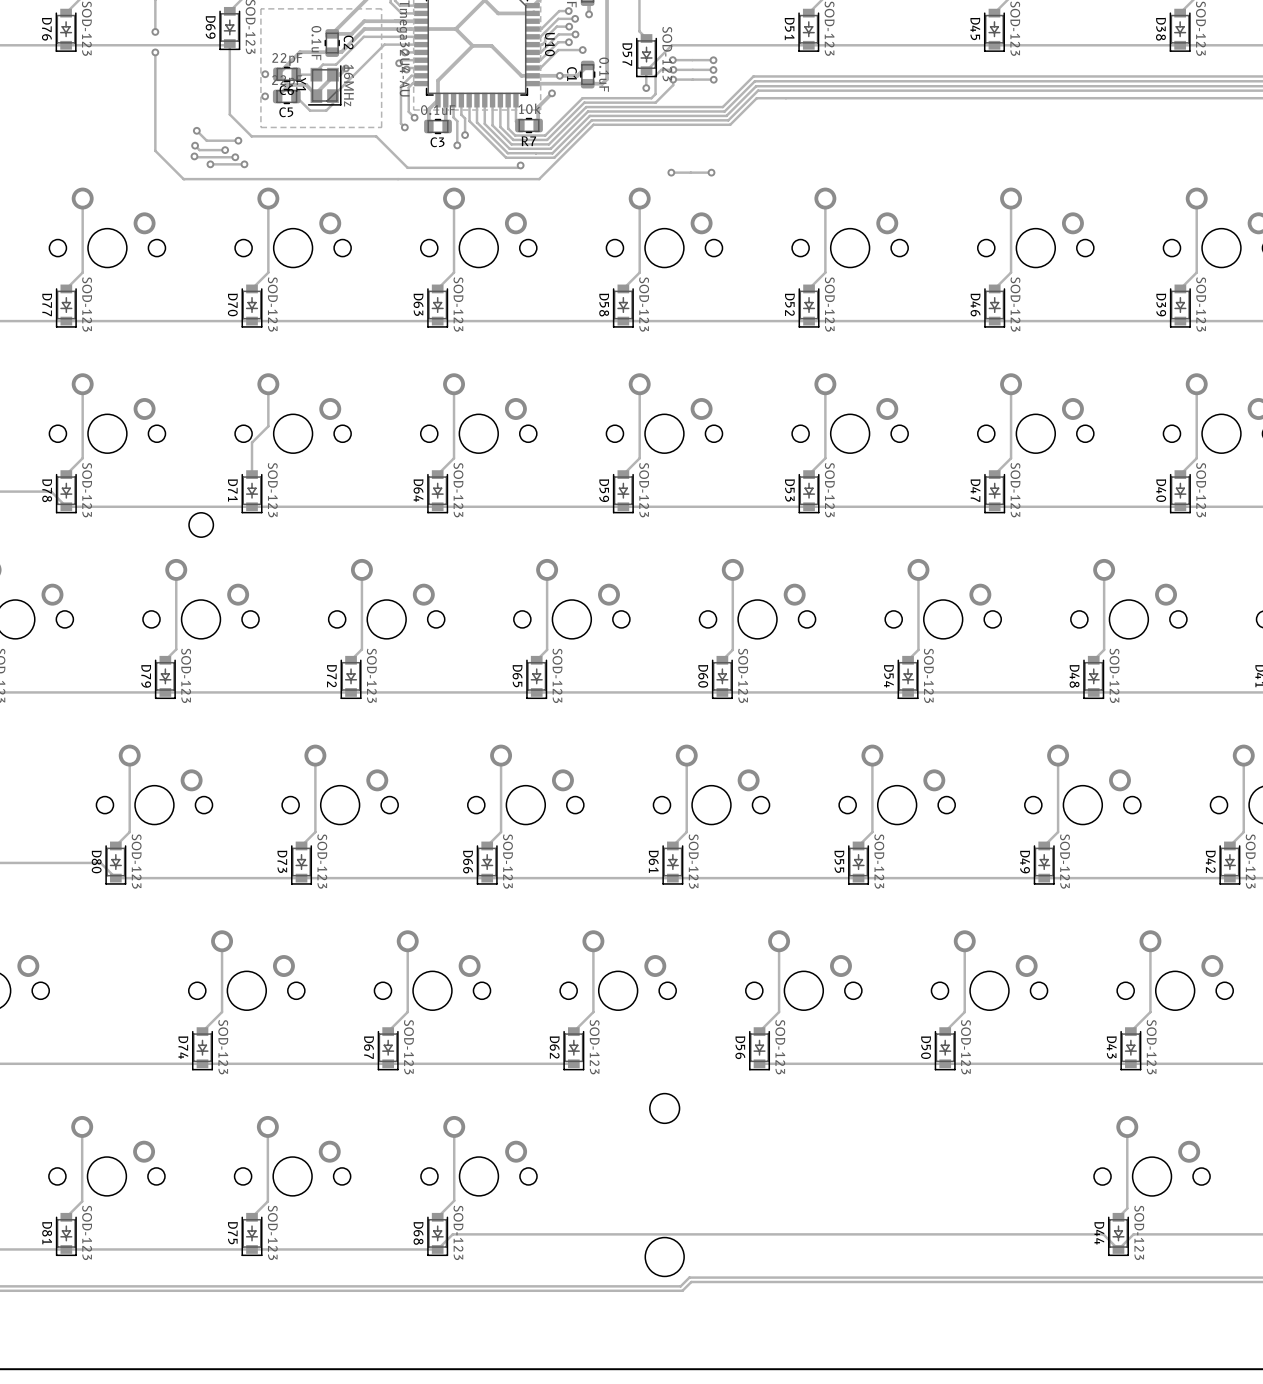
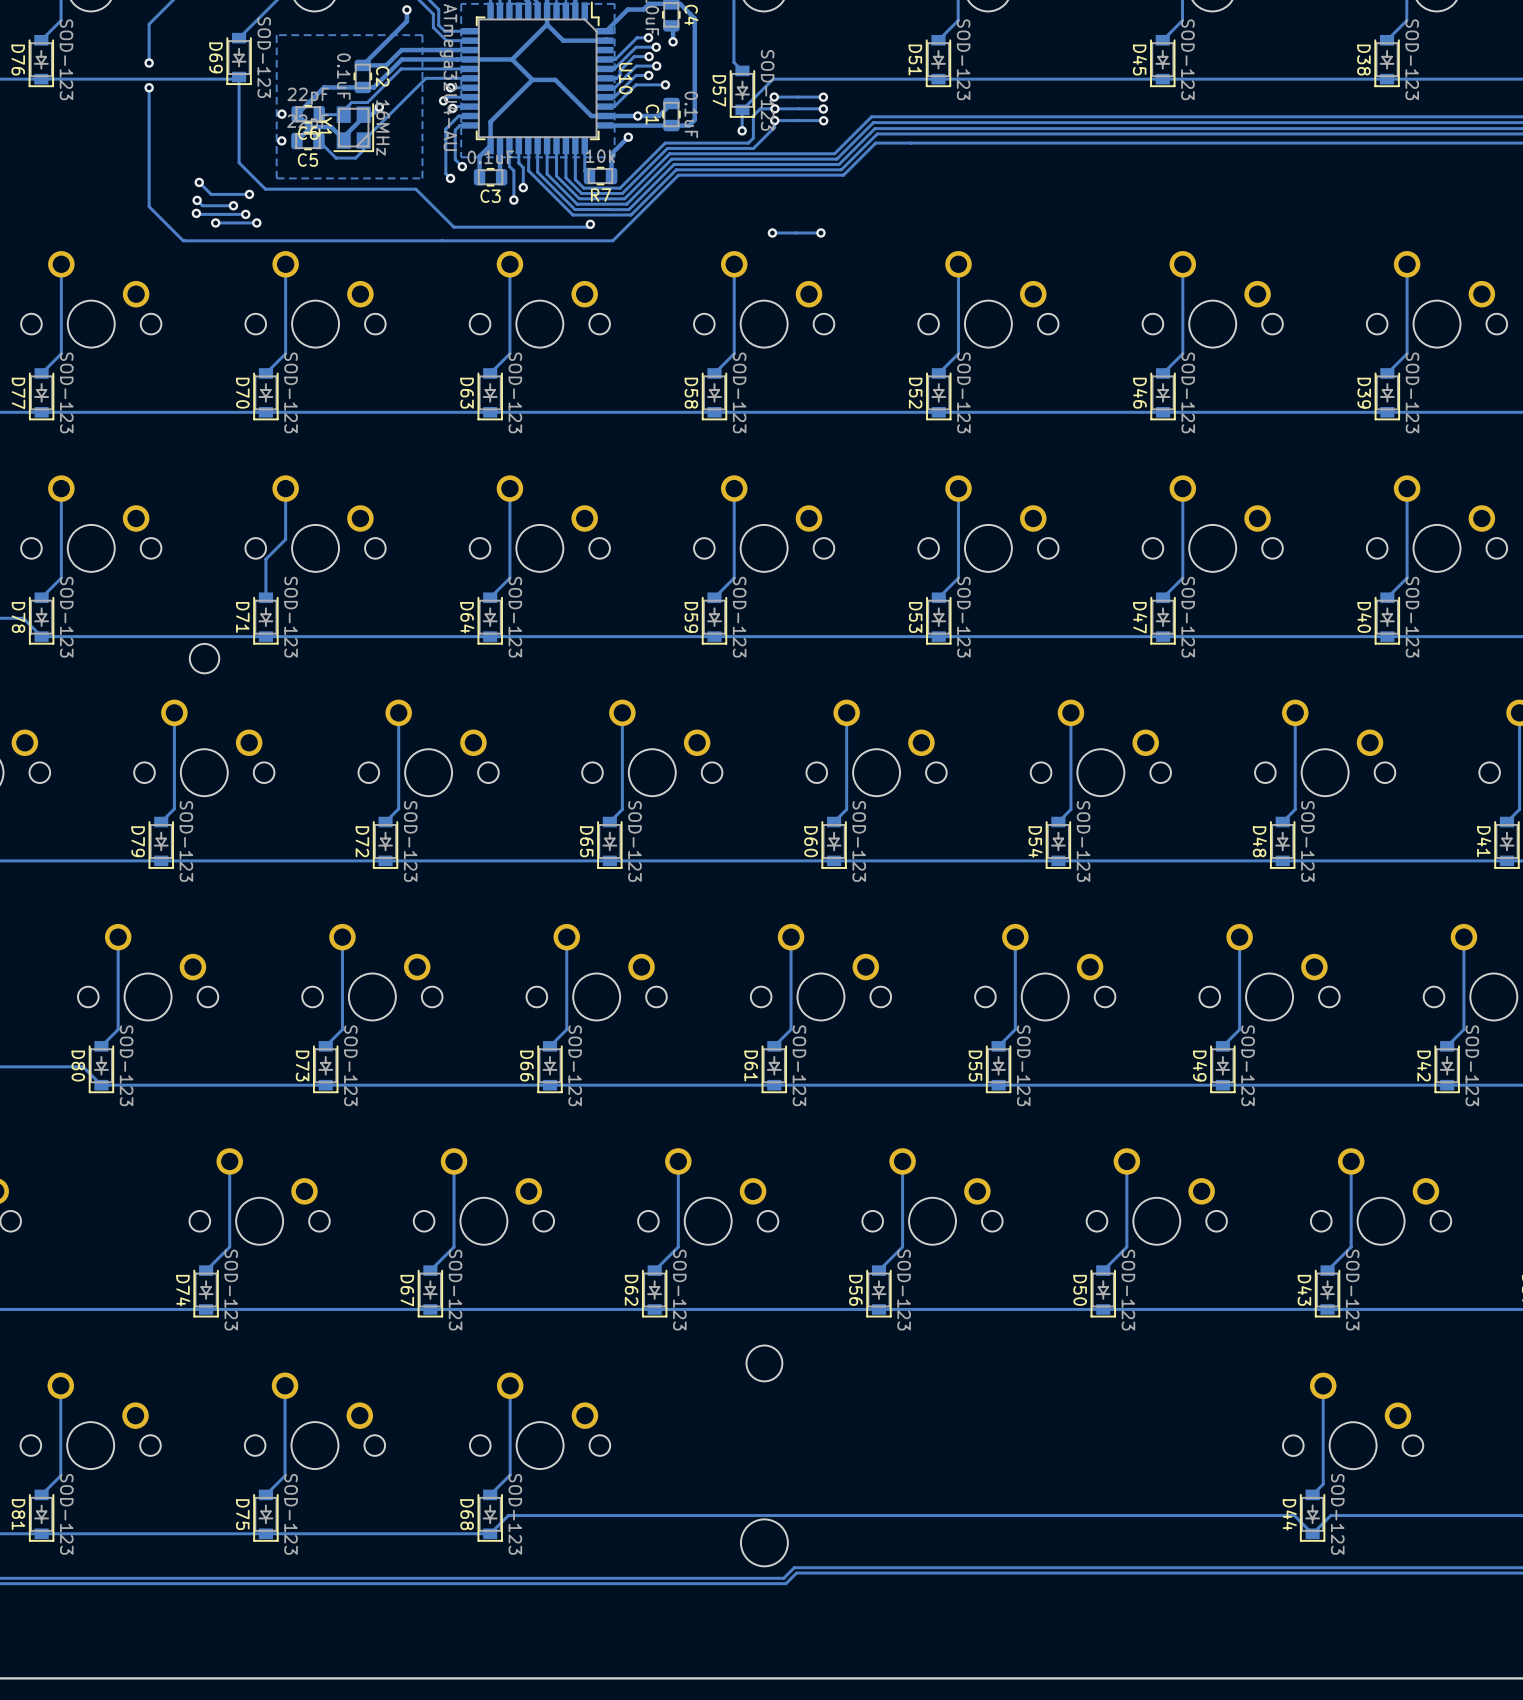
track: none -> (878, 1309) (654, 1309)

